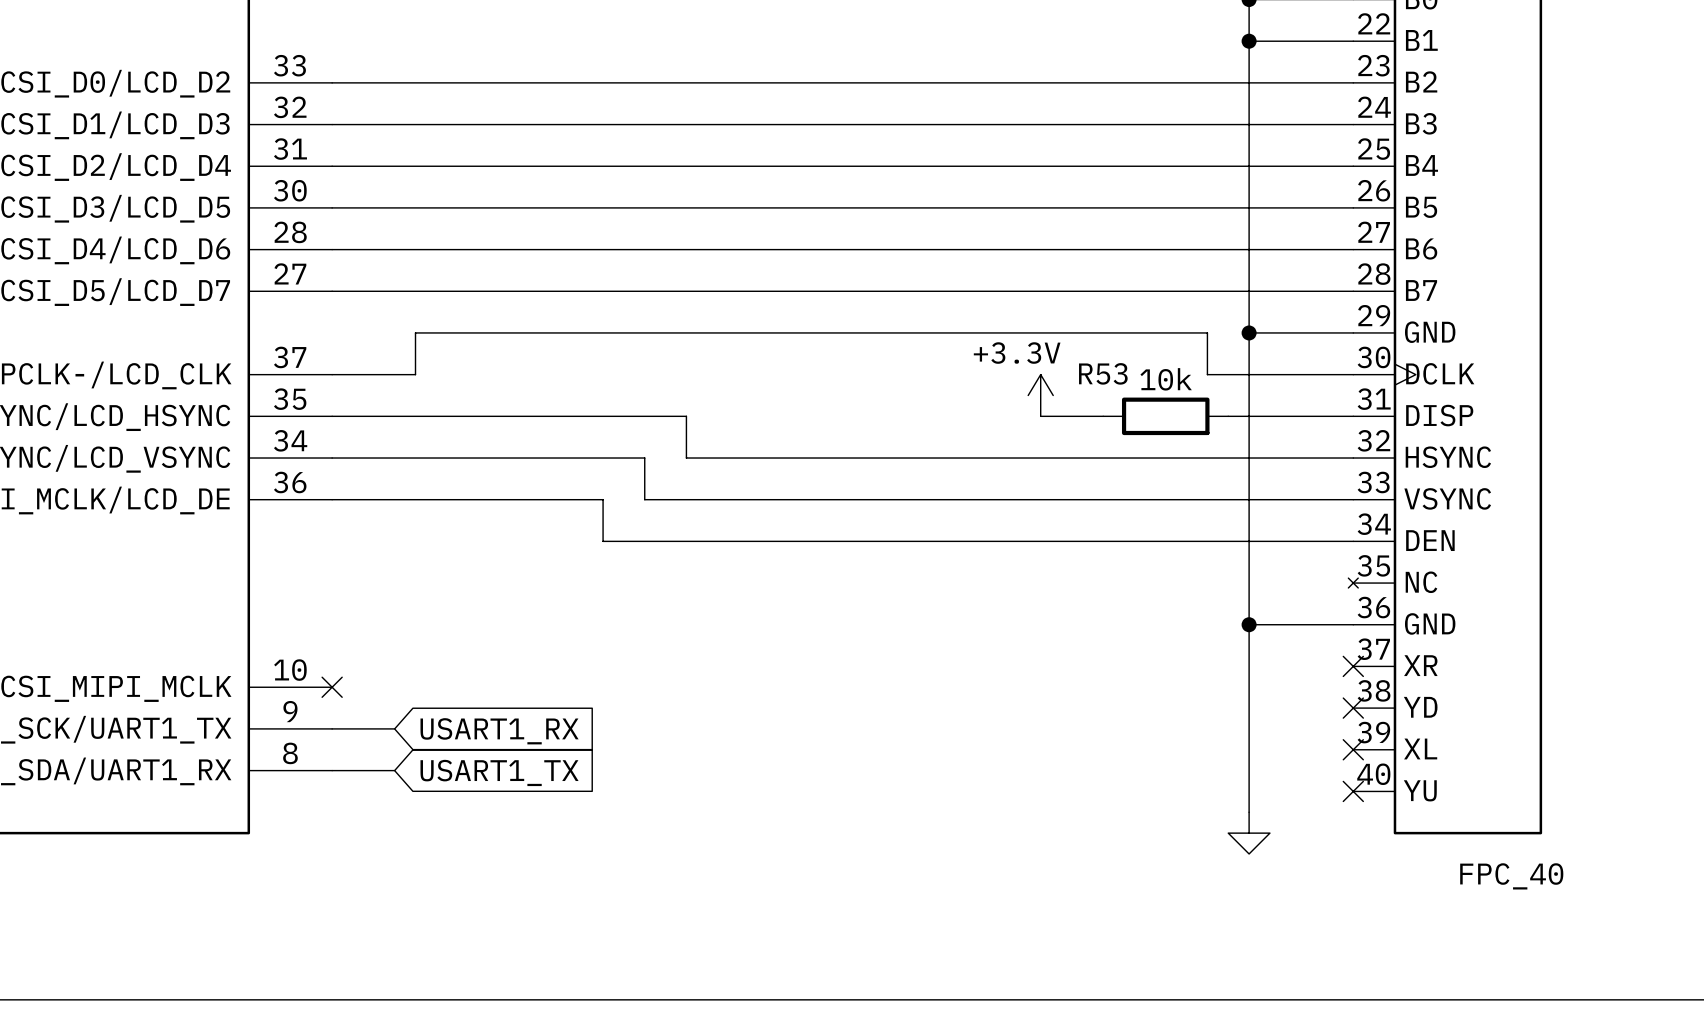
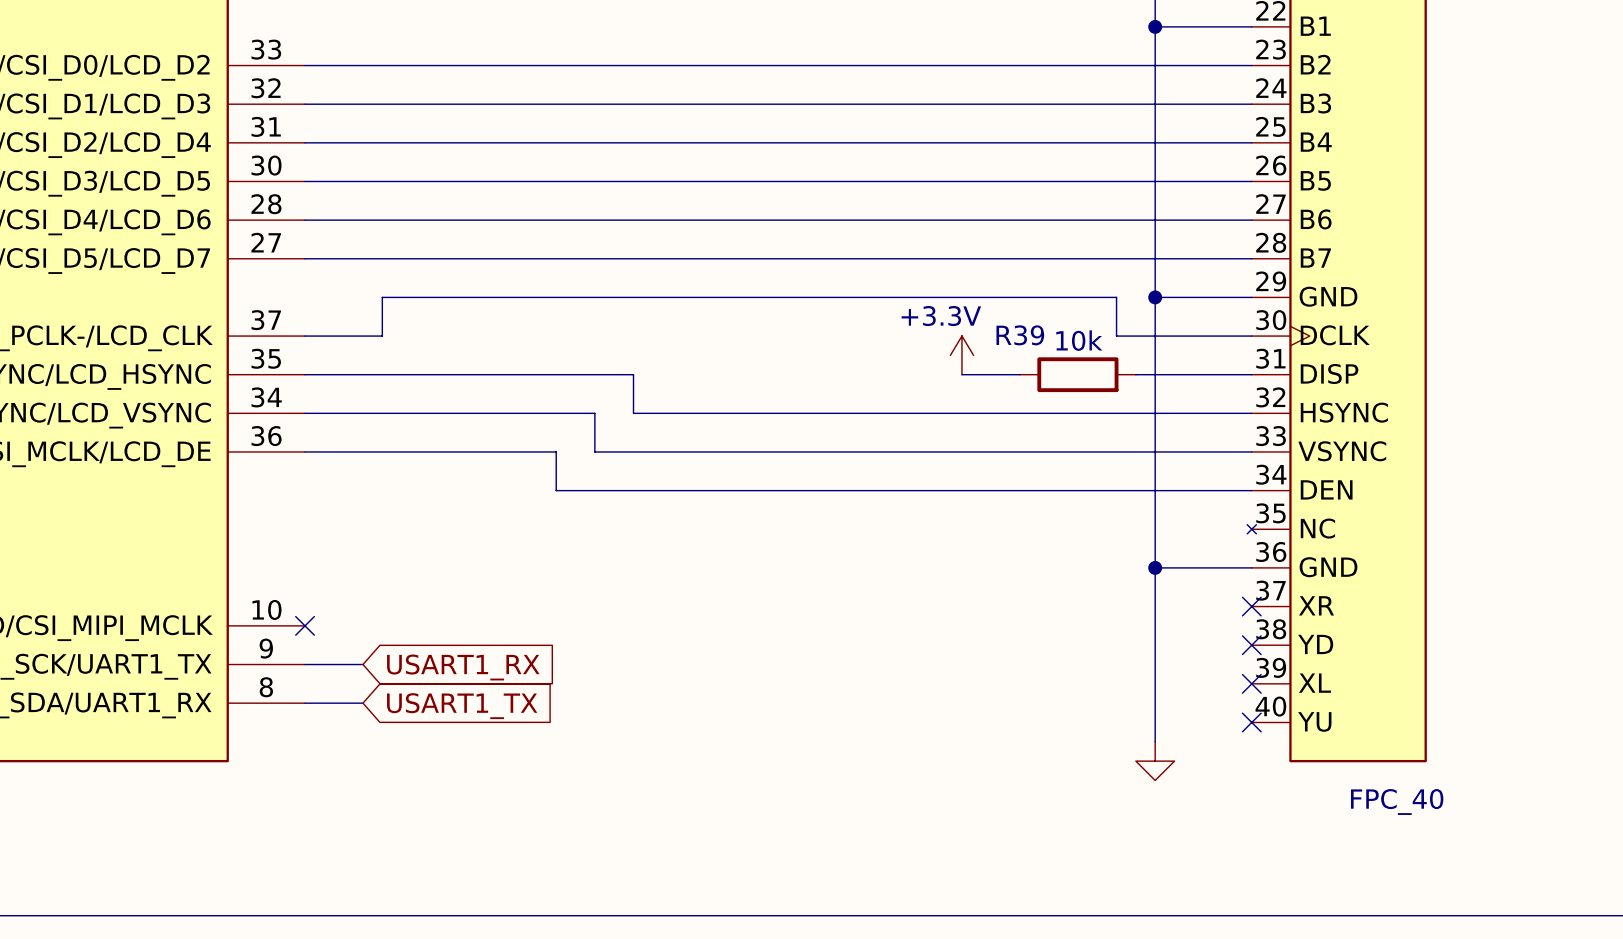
R53 name: R53 (1103, 373) -> R39 (1020, 335)

